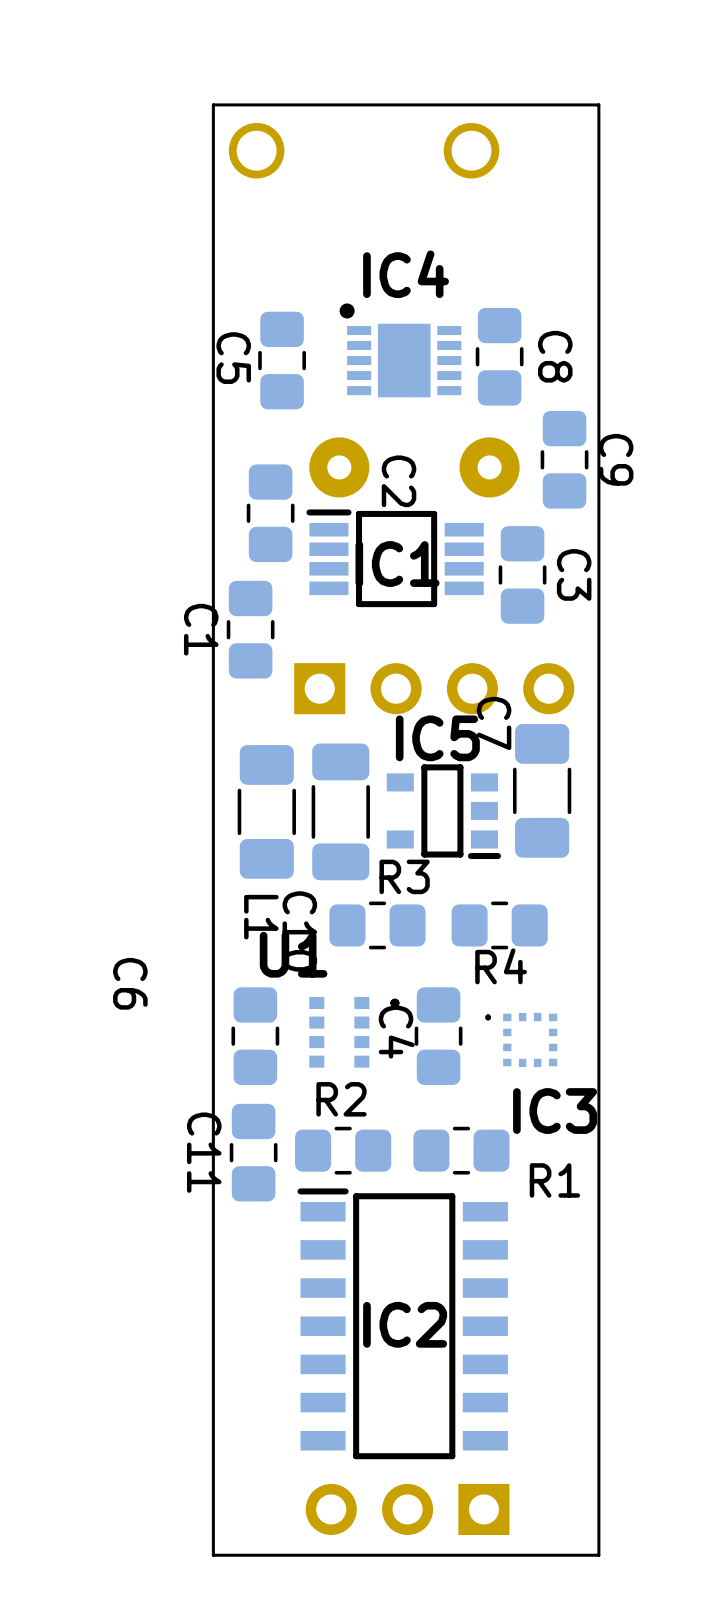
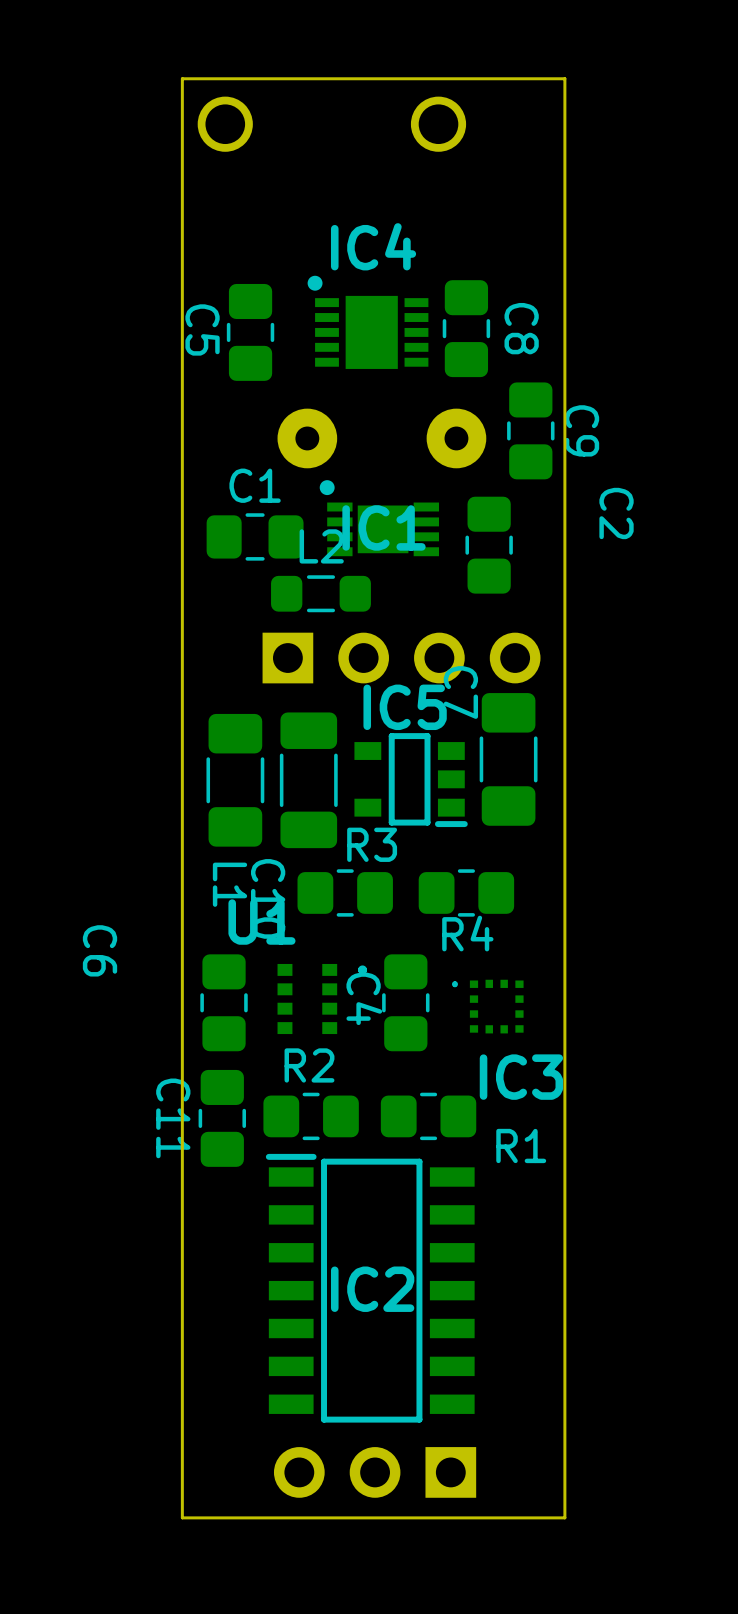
IC1 footprint: [306, 509, 484, 608] -> [319, 480, 440, 557]
C2: (270, 513) -> none
C3 name: C3 (574, 574) -> C2 (616, 513)
L2: none -> (320, 593)
C1 rotation: 0° (250, 629) -> 90° clockwise (255, 536)
C1 position: (250, 629) -> (255, 536)

